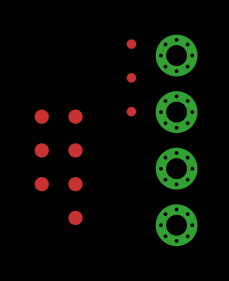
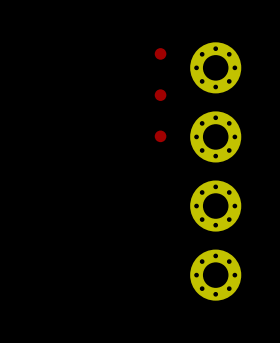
part: (41, 116) -> none
part: (75, 116) -> none
part: (41, 150) -> none
part: (75, 150) -> none
part: (41, 184) -> none
part: (75, 184) -> none
part: (75, 217) -> none

